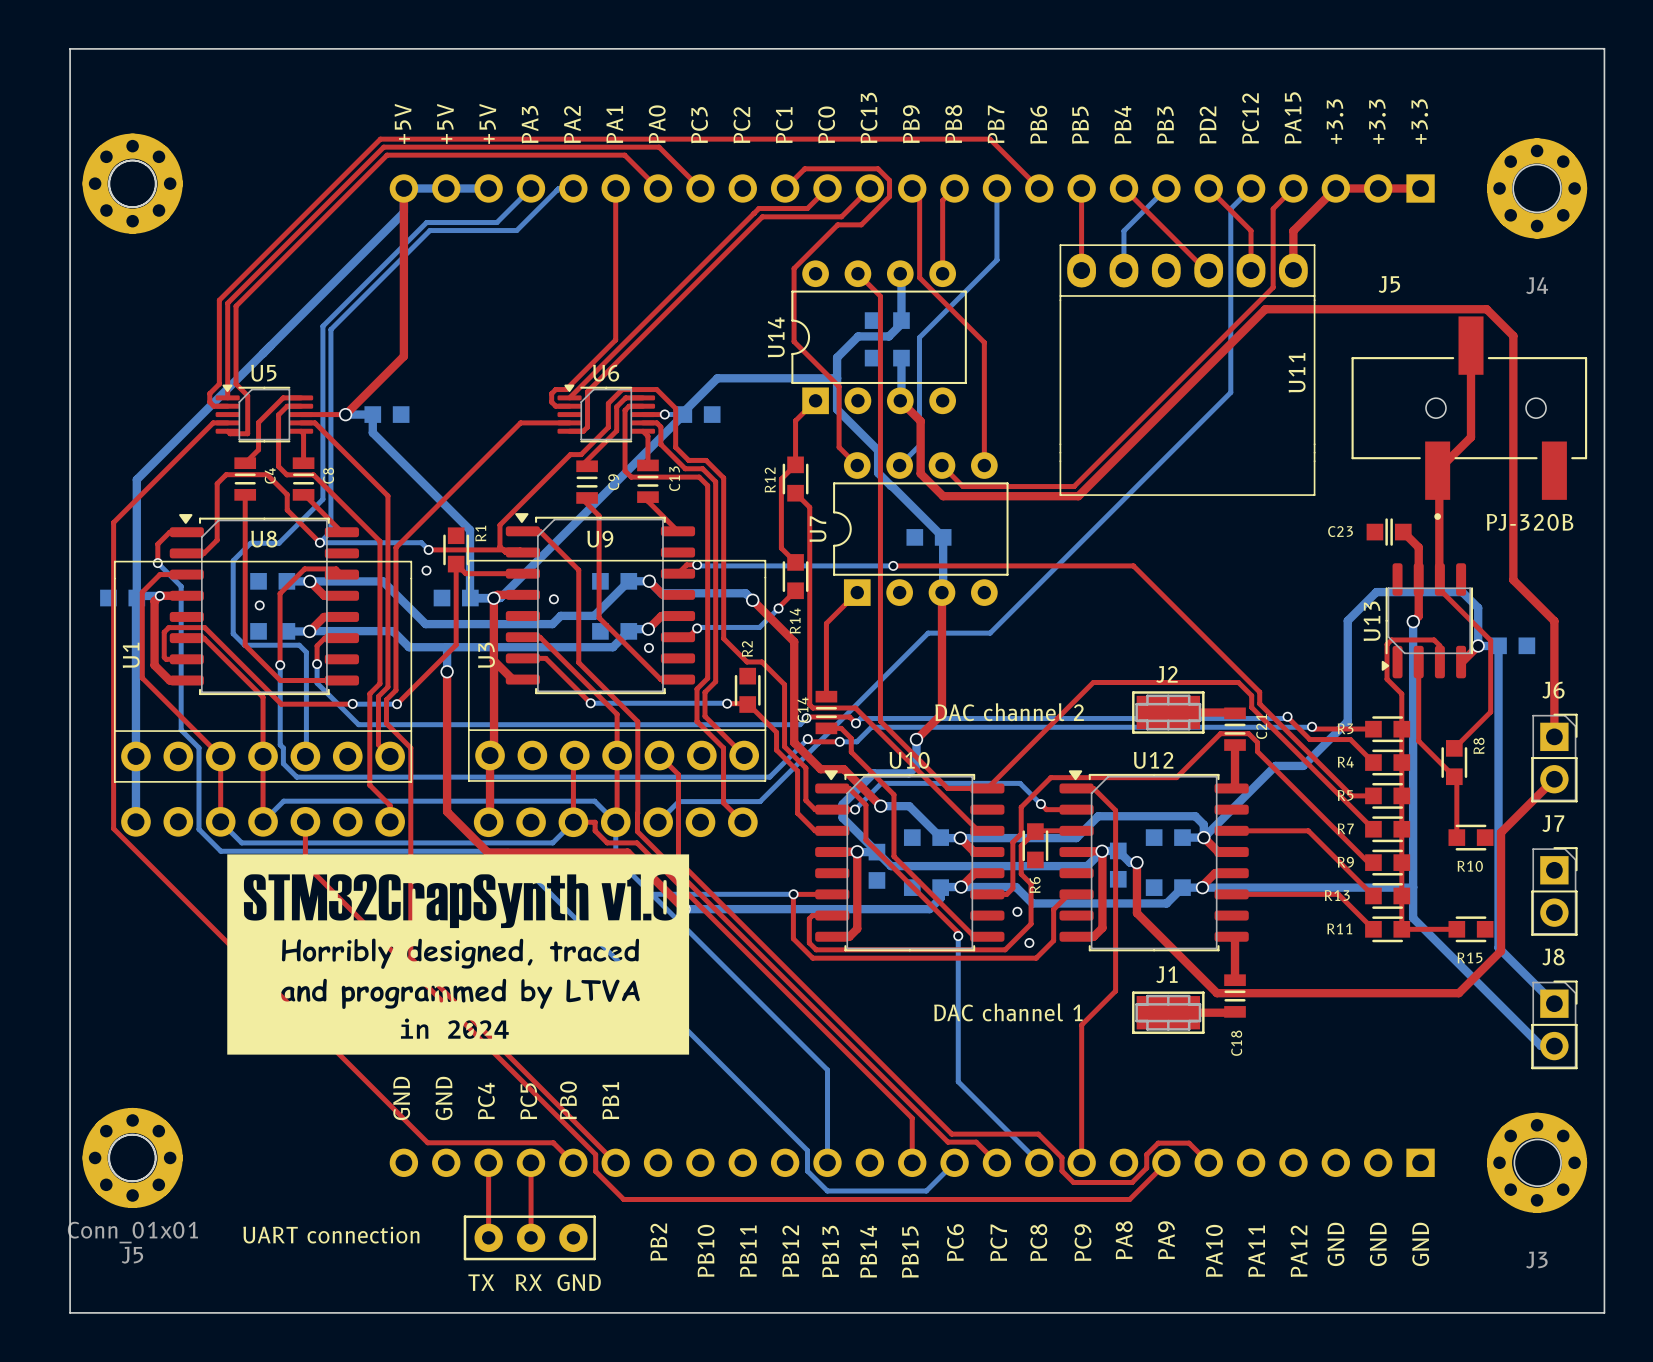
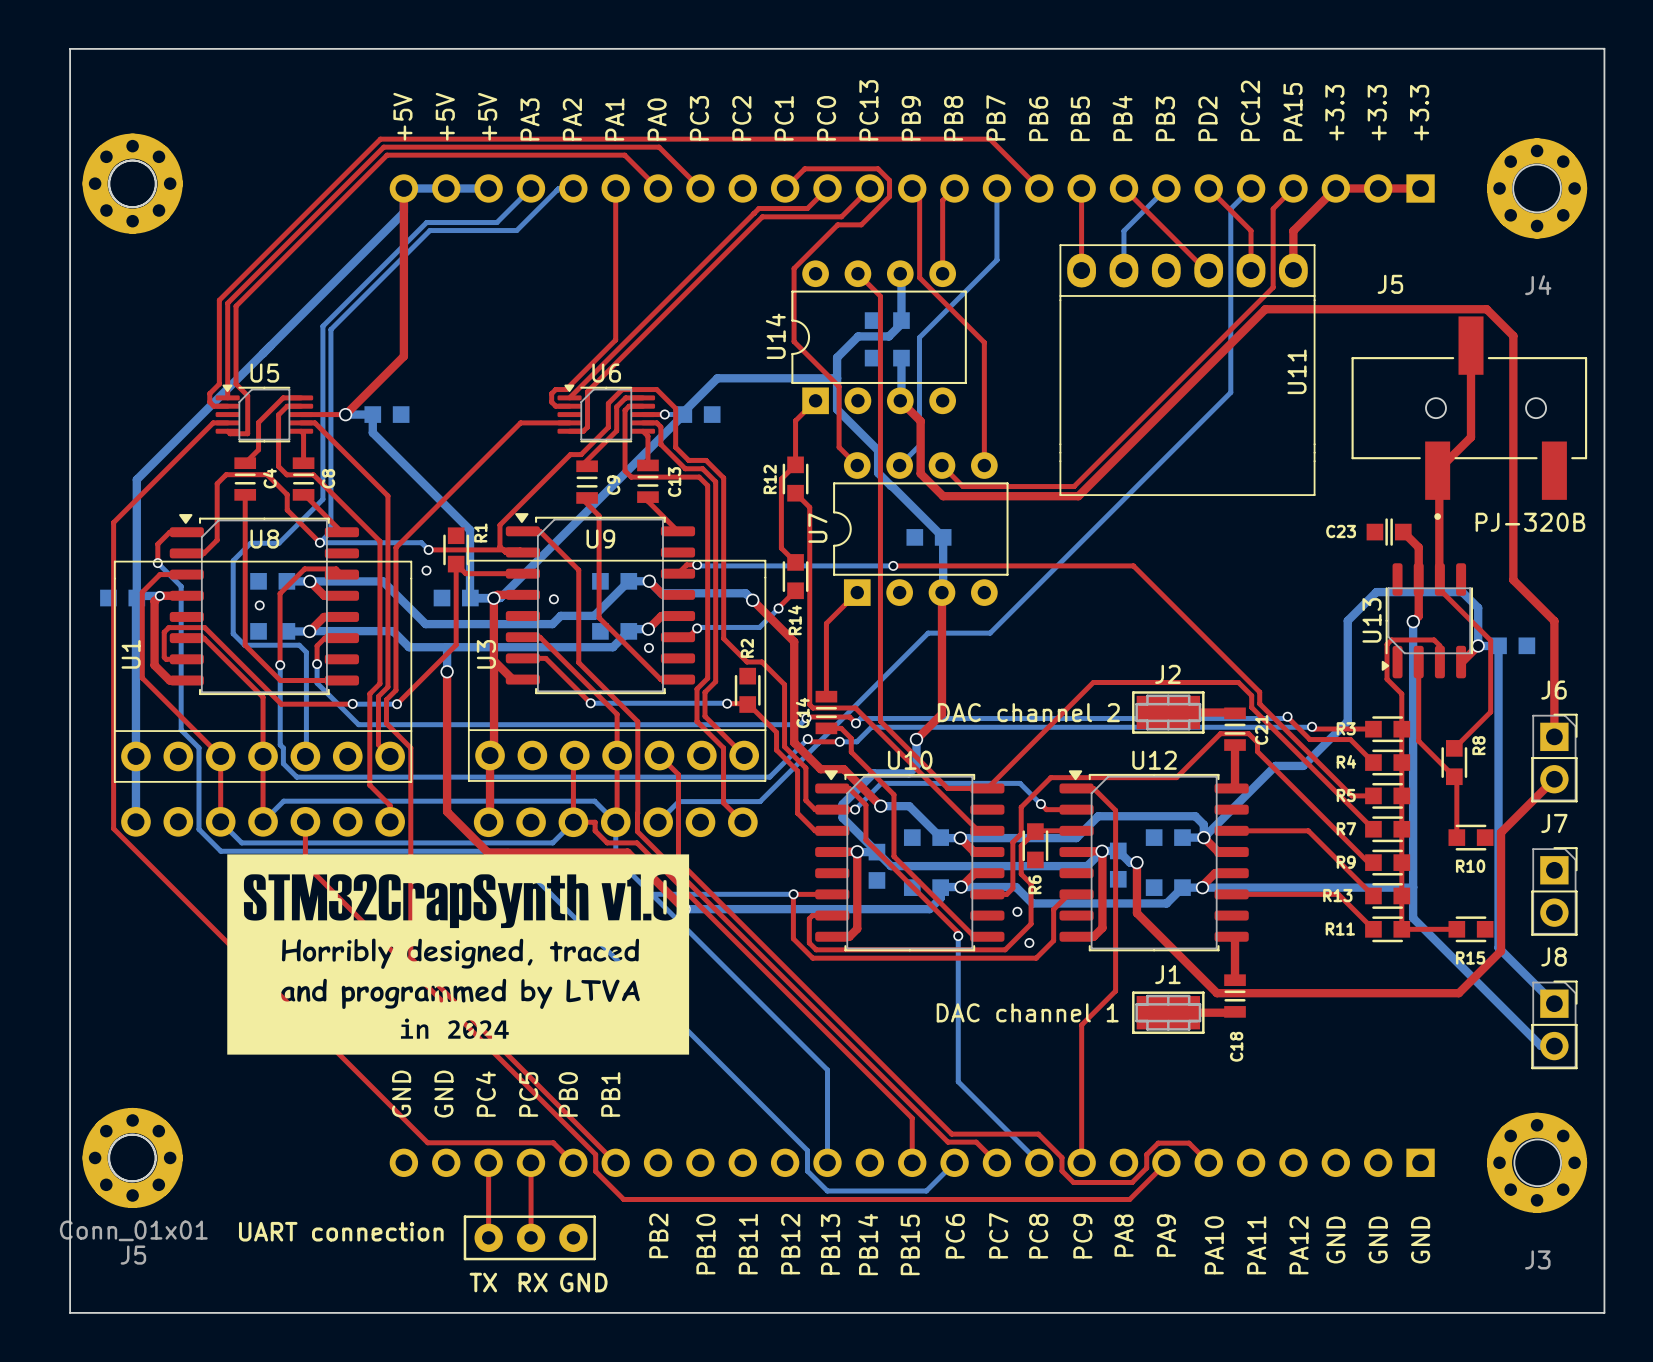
part footprint: [463, 1215, 596, 1261] -> [463, 1215, 596, 1261]

